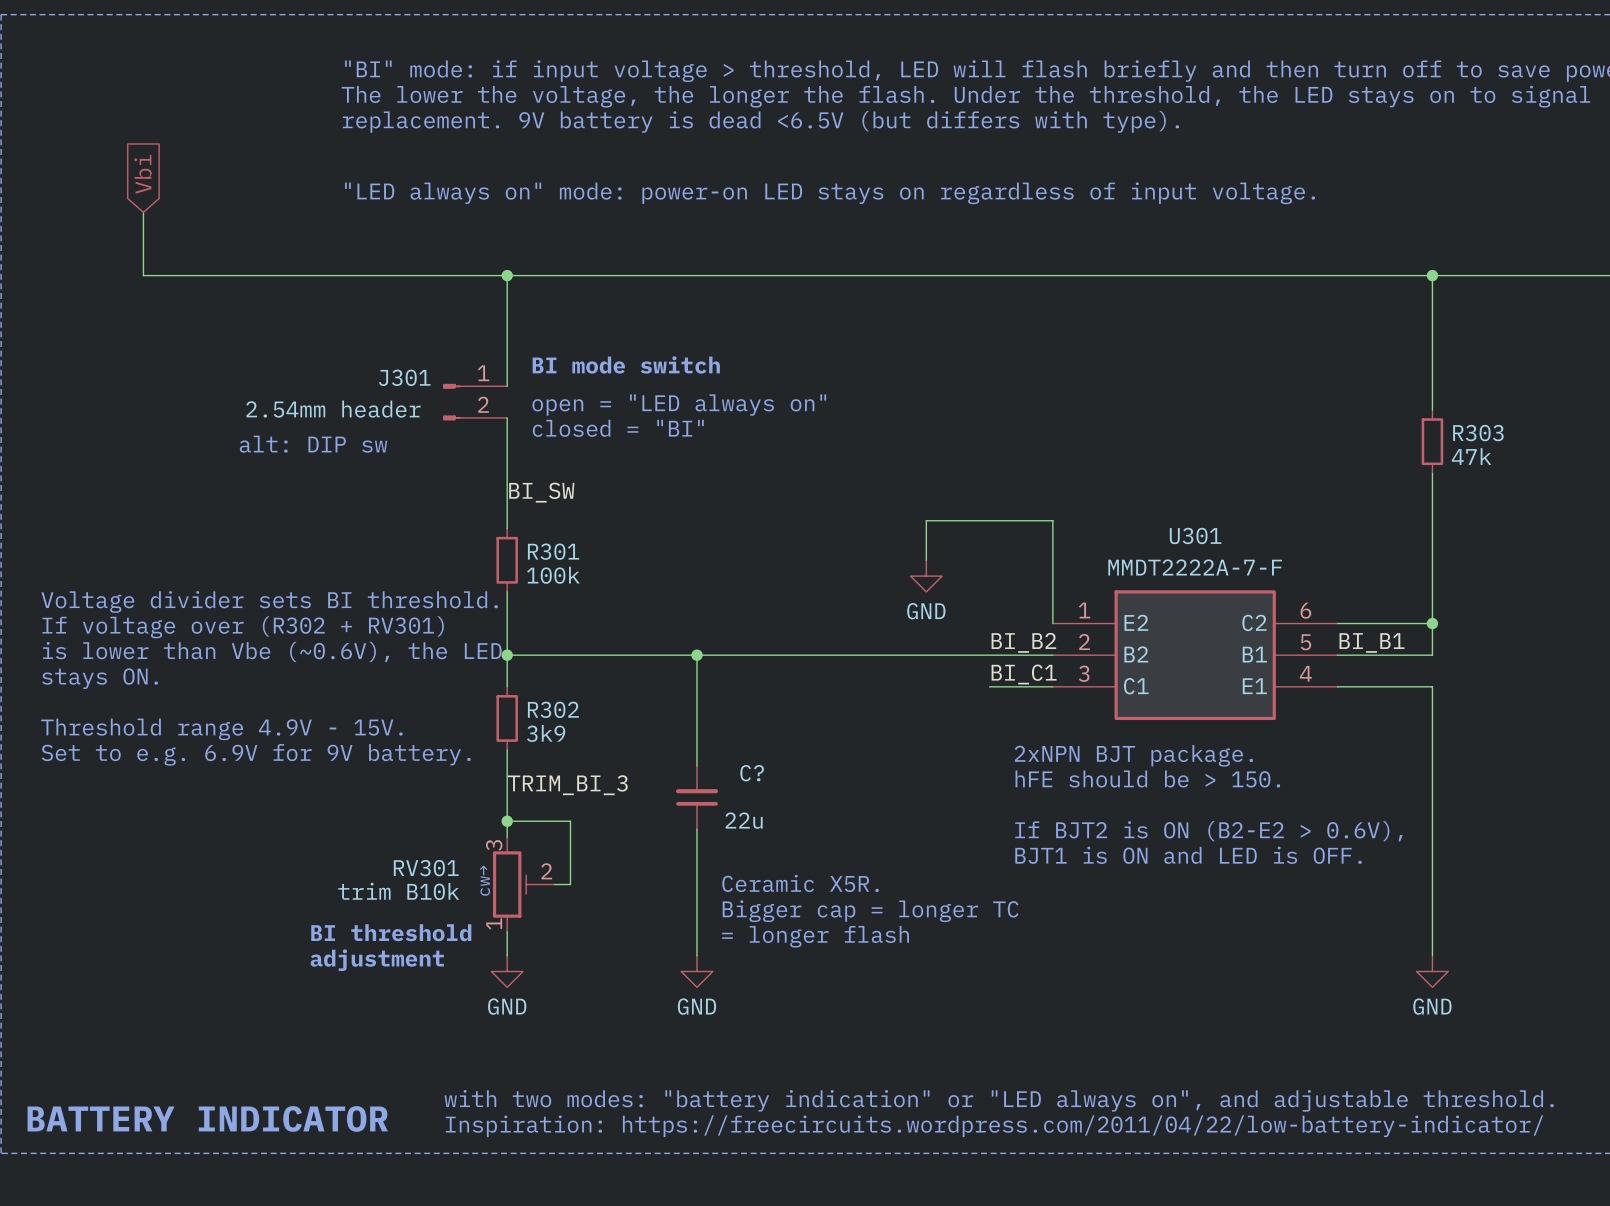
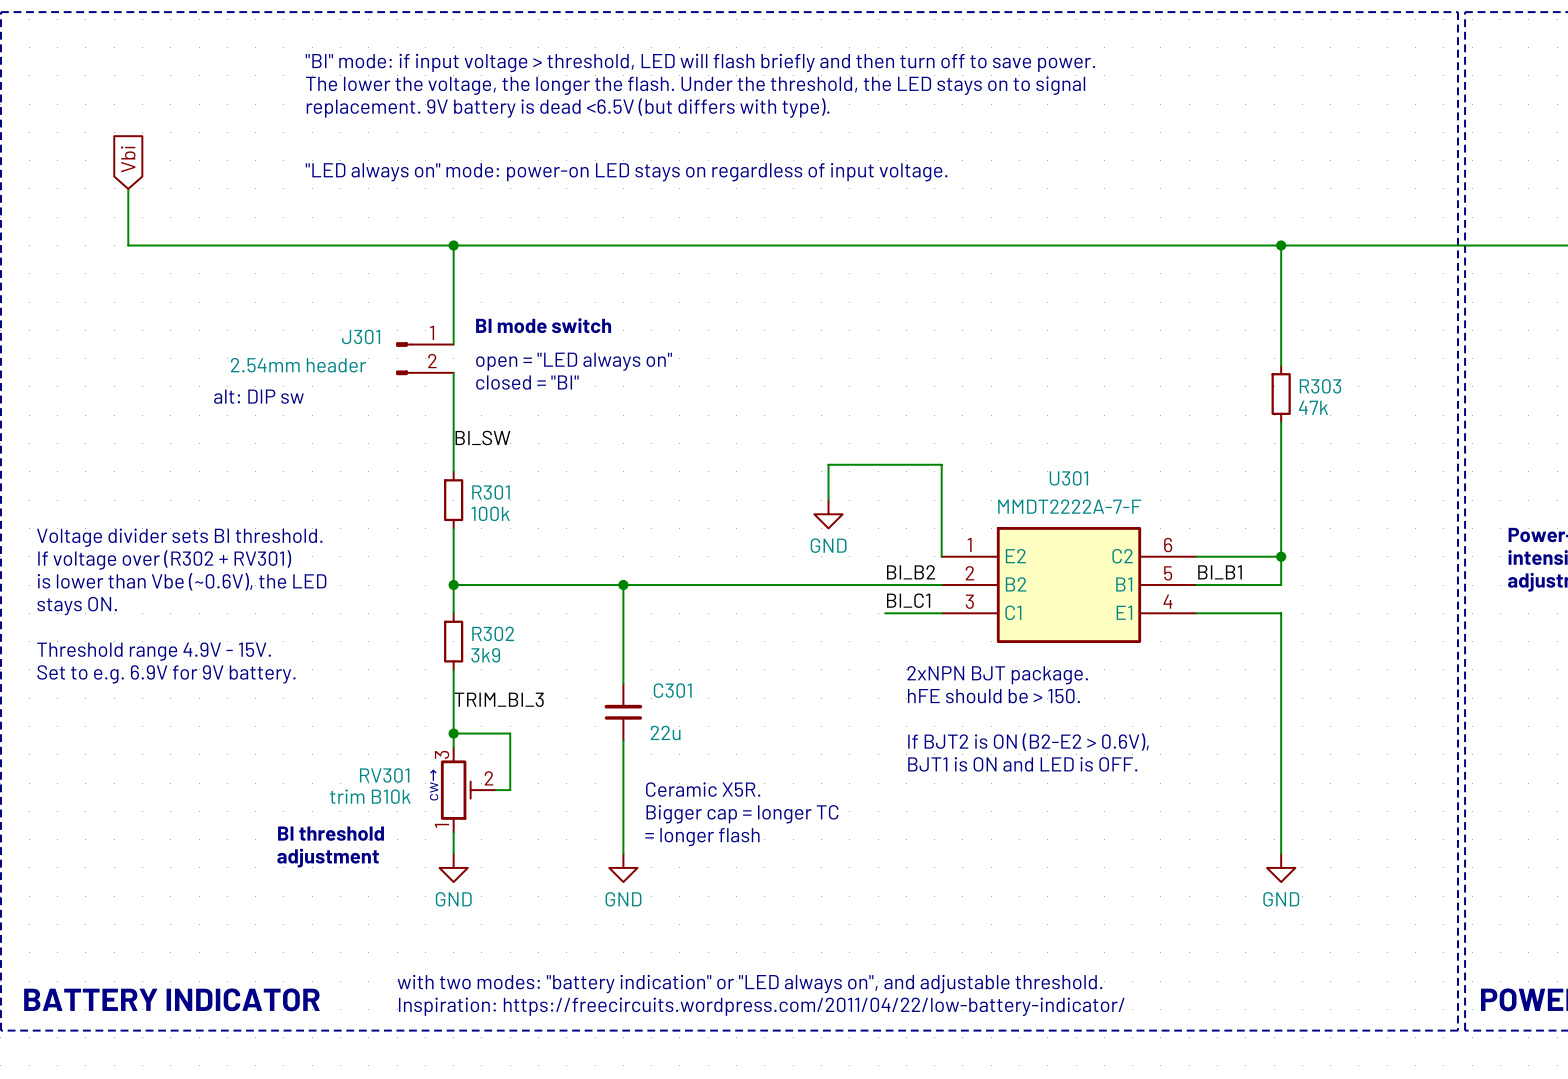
C? name: C? (752, 773) -> C301 (672, 690)

